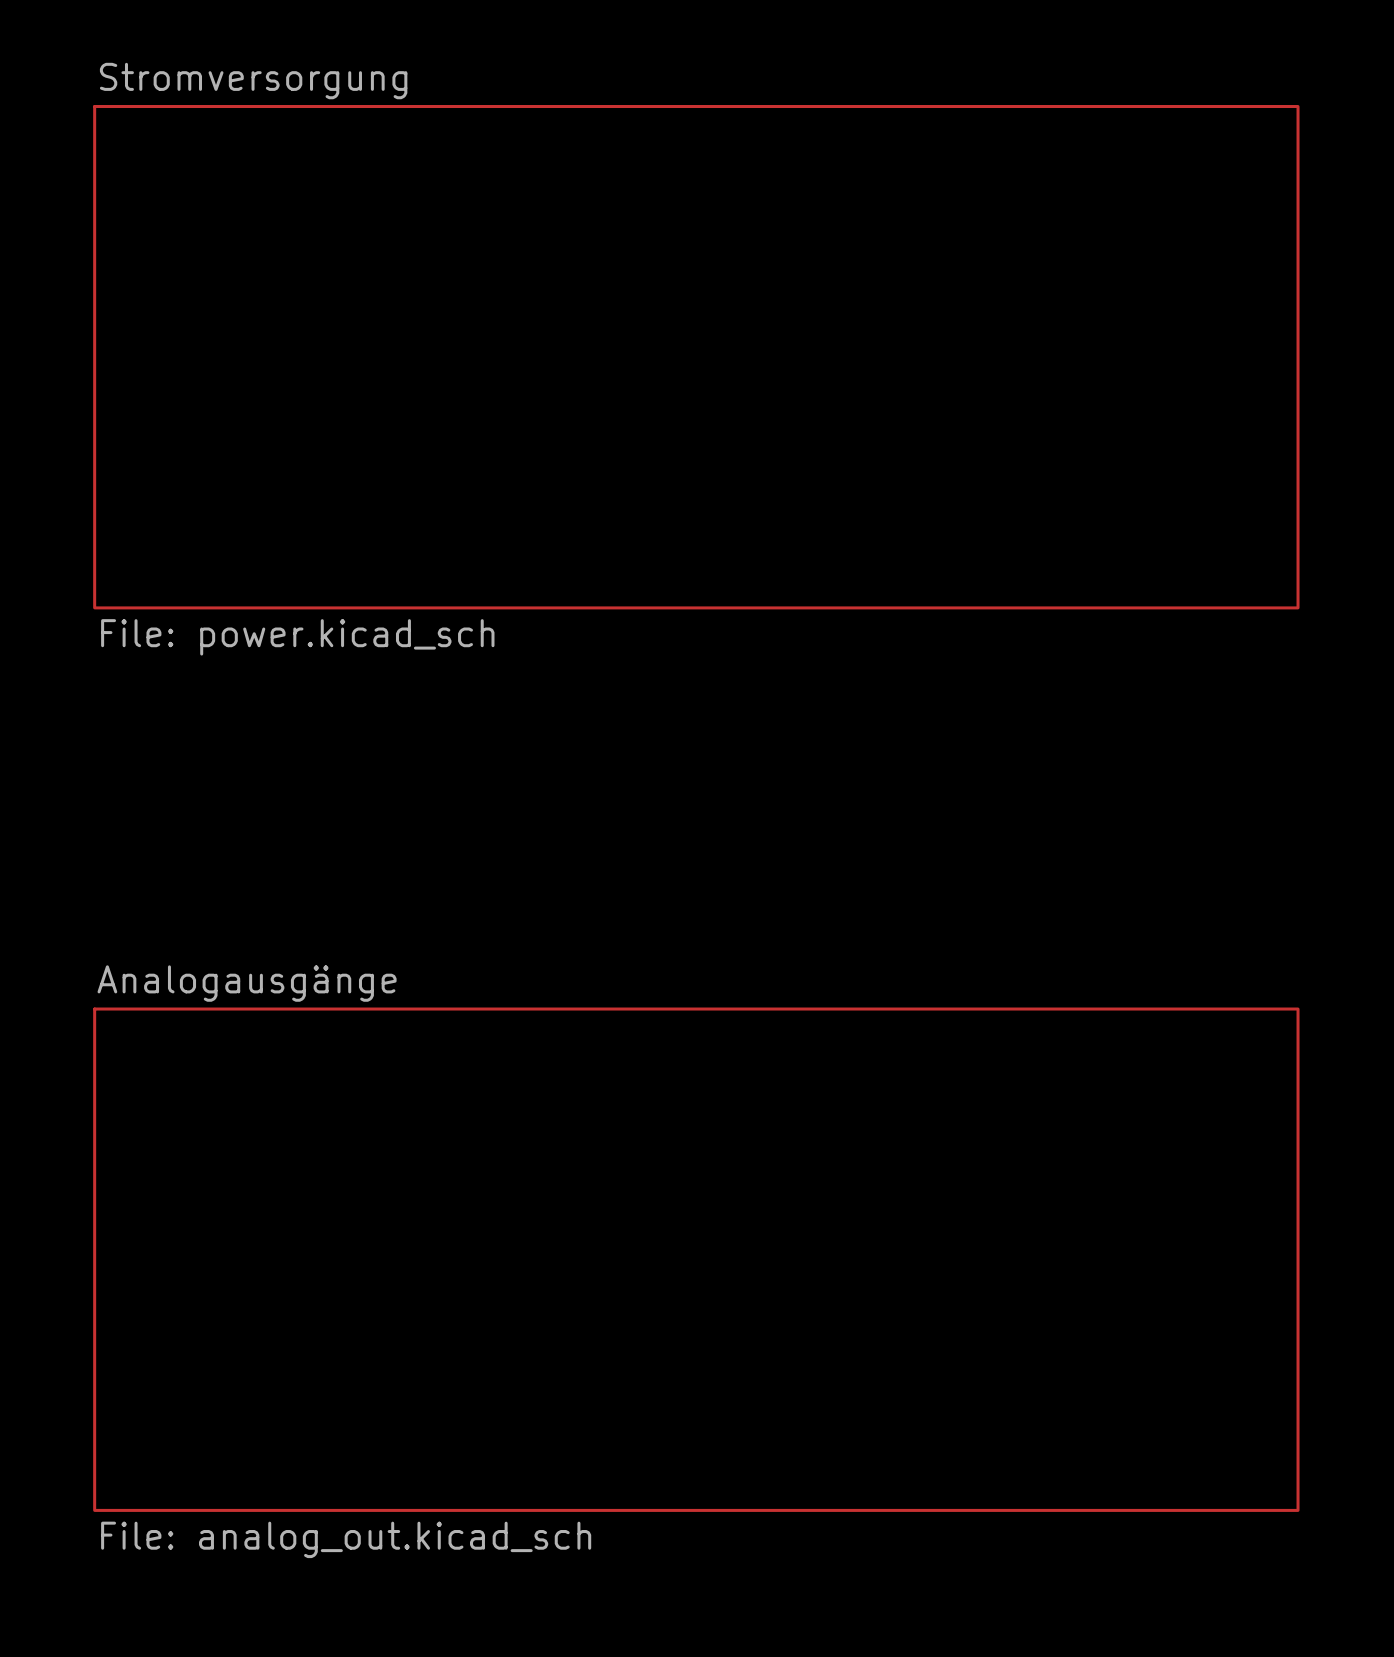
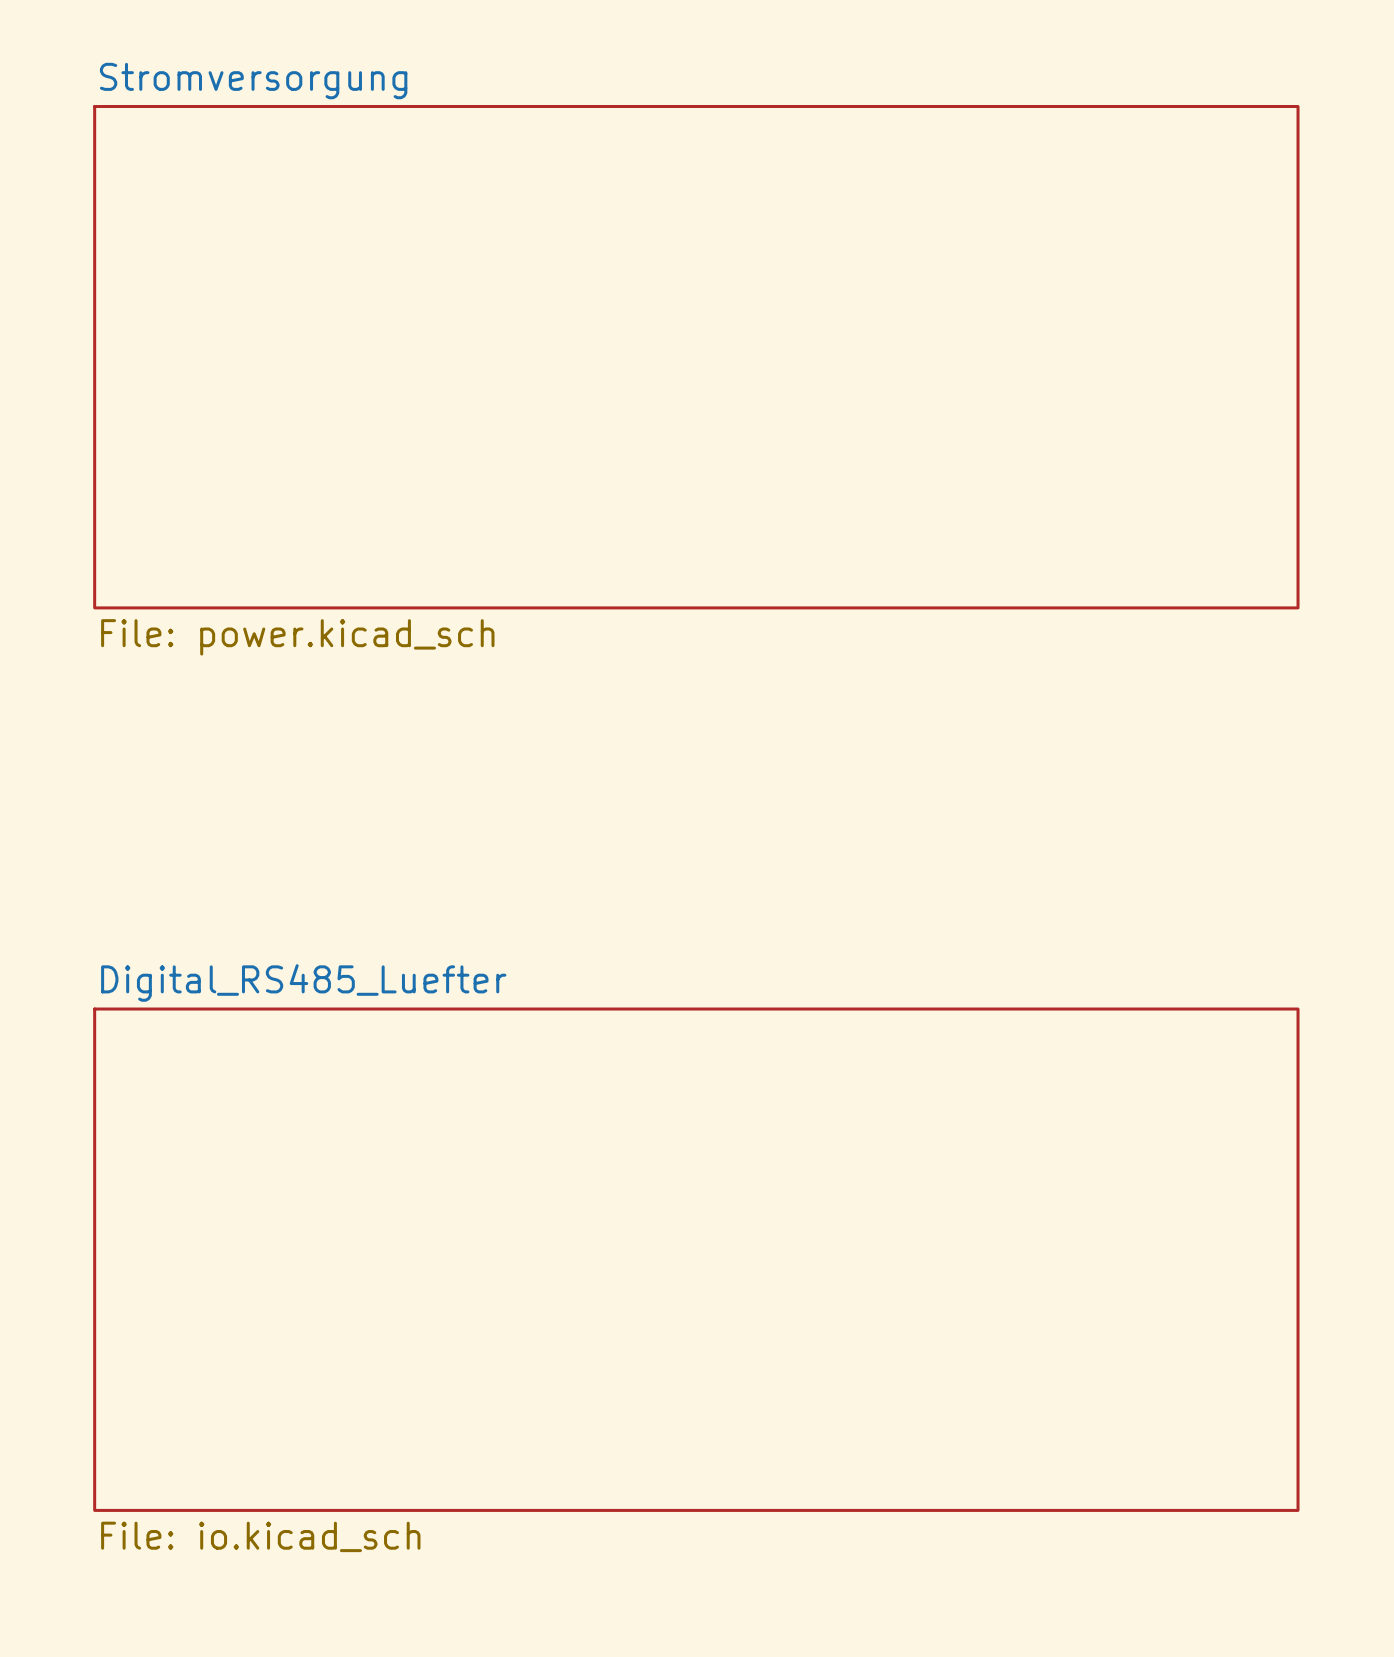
sheet Analogausgänge name: Analogausgänge (247, 983) -> Digital_RS485_Luefter (303, 982)
sheet Analogausgänge value: File: analog_out.kicad_sch (346, 1539) -> File: io.kicad_sch (260, 1536)

